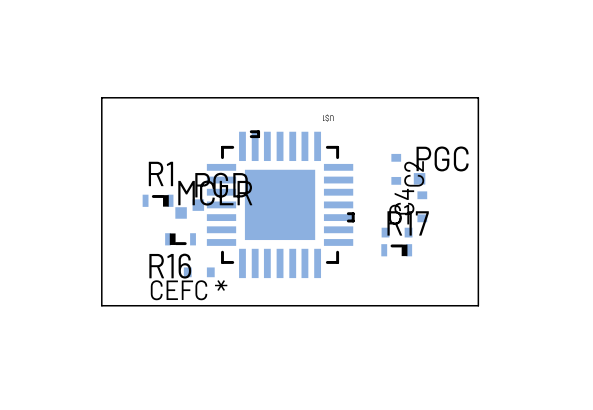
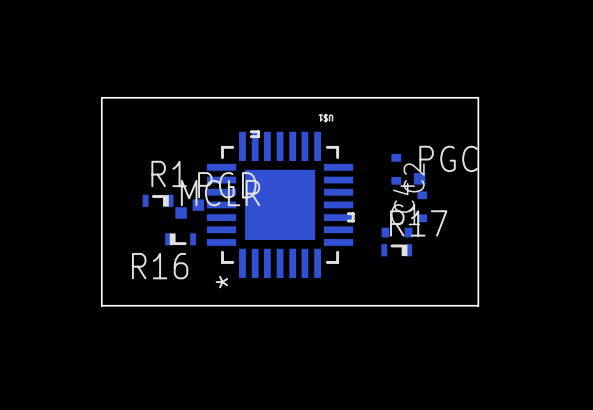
CEFC: (199, 272) -> none

